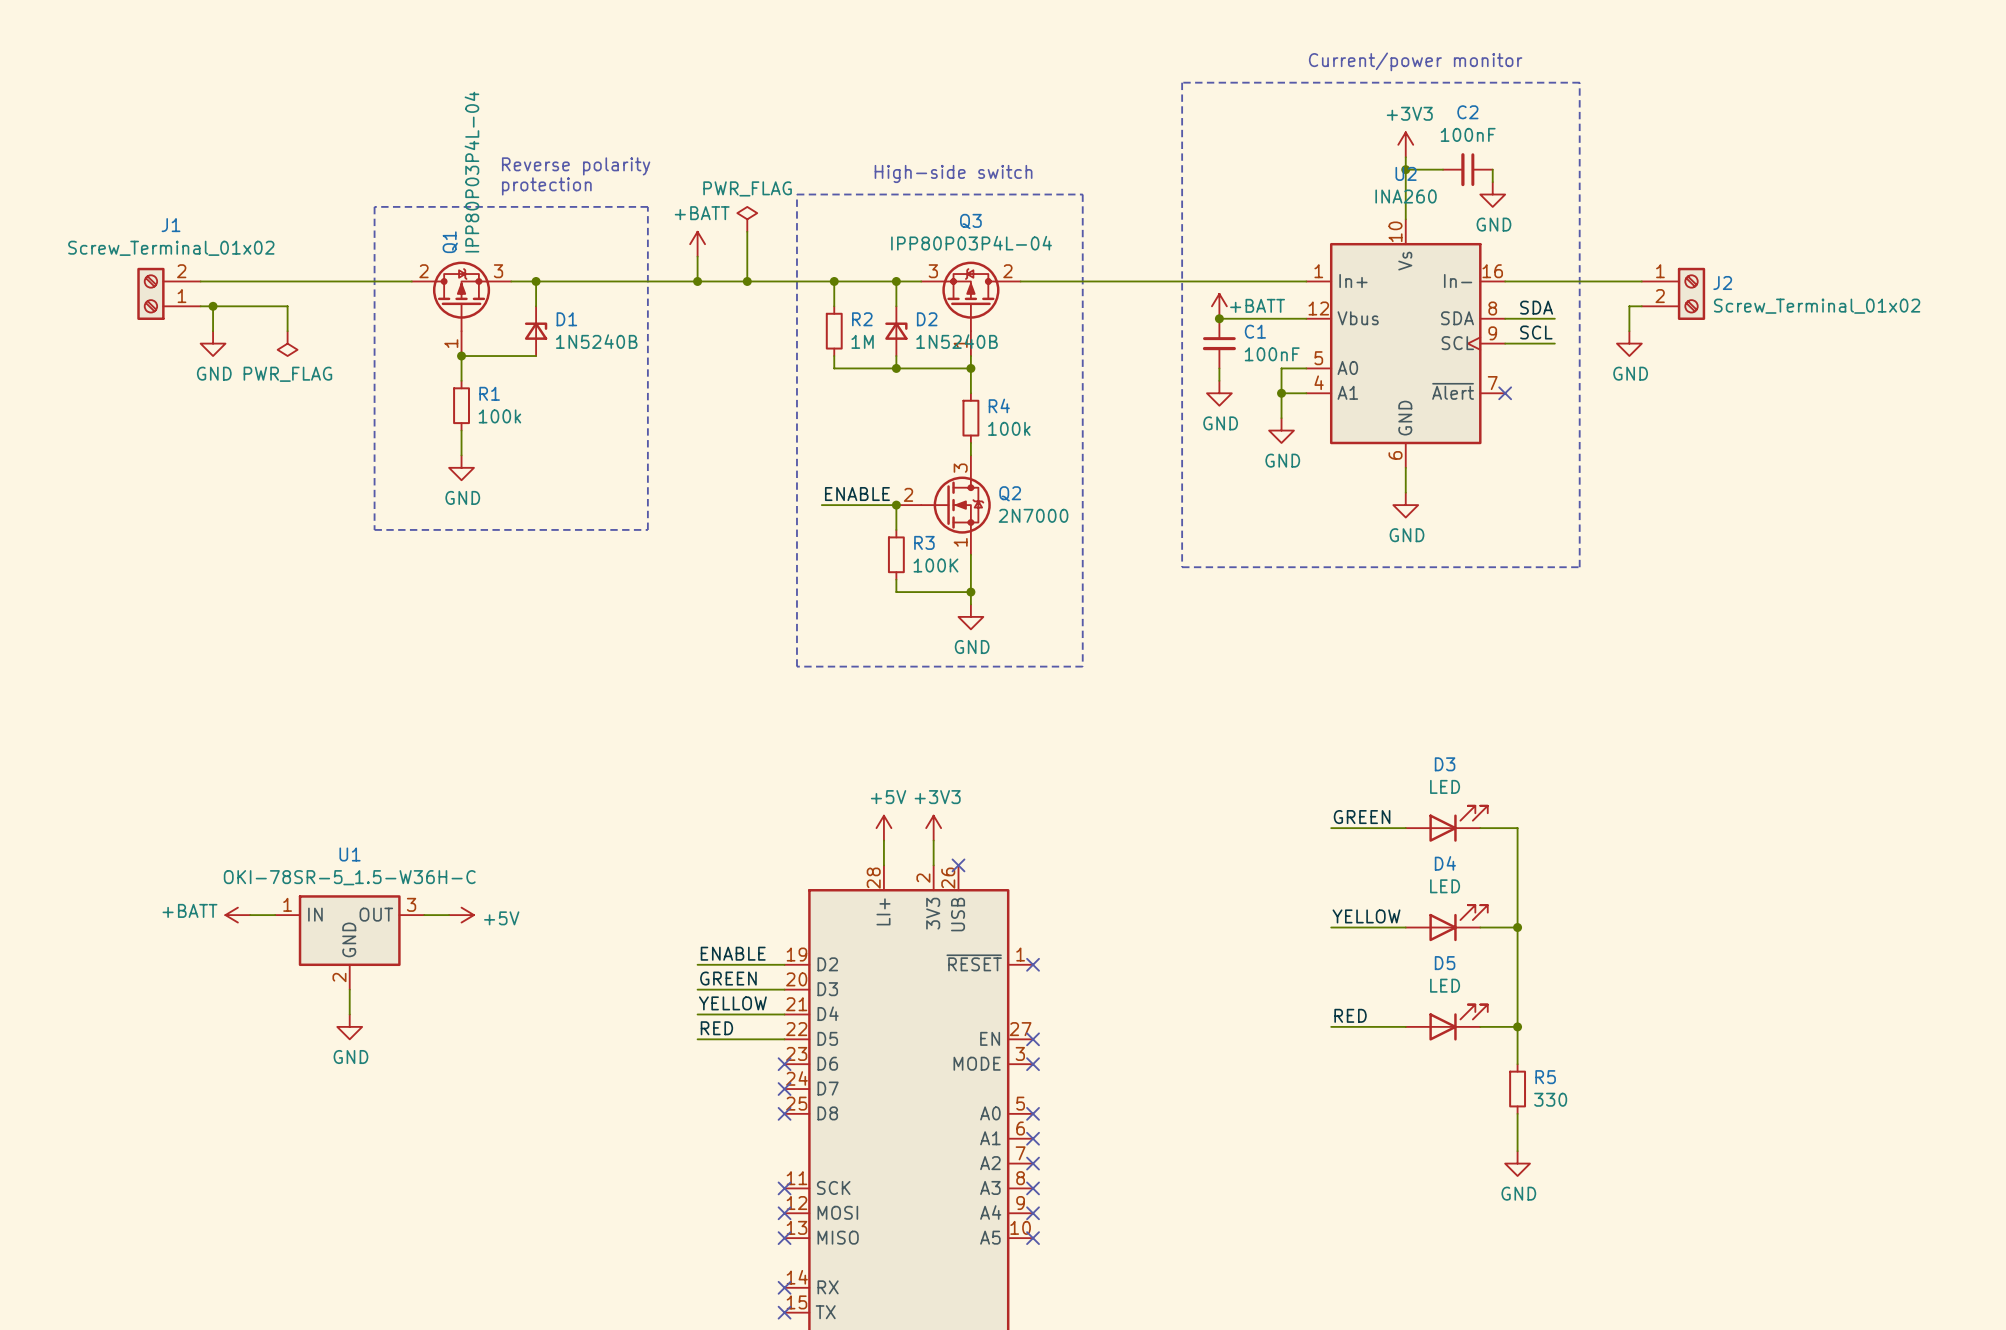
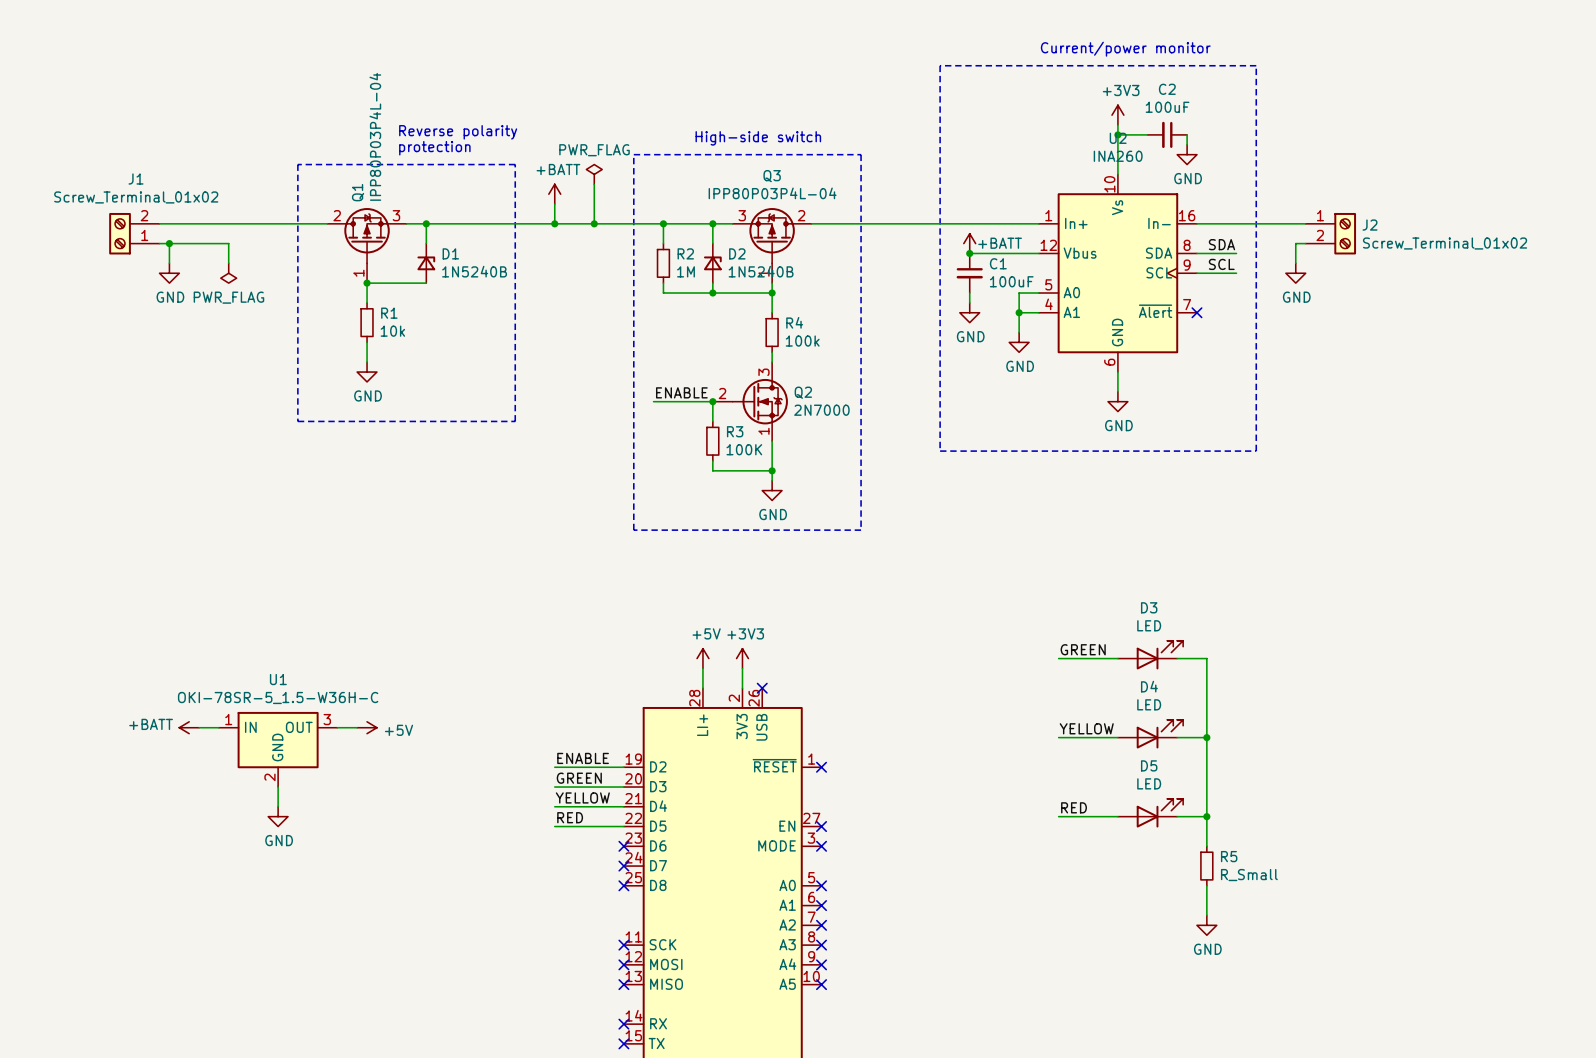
C2 value: 100nF (1468, 134) -> 100uF (1167, 107)
C1 value: 100nF (1272, 354) -> 100uF (1011, 281)
R1 value: 100k (499, 416) -> 10k (392, 331)
R5 value: 330 (1550, 1099) -> R_Small (1249, 875)

